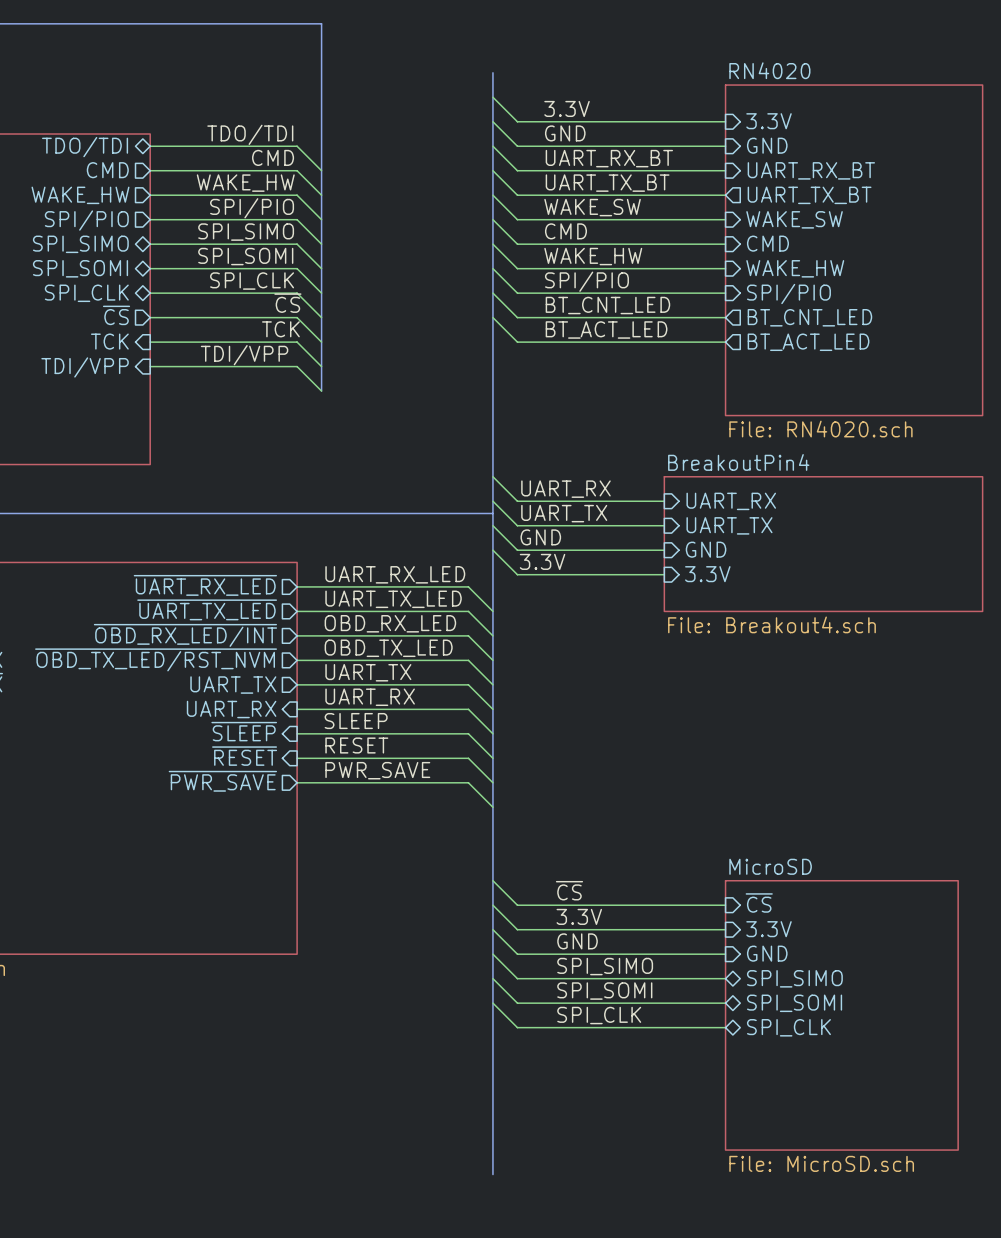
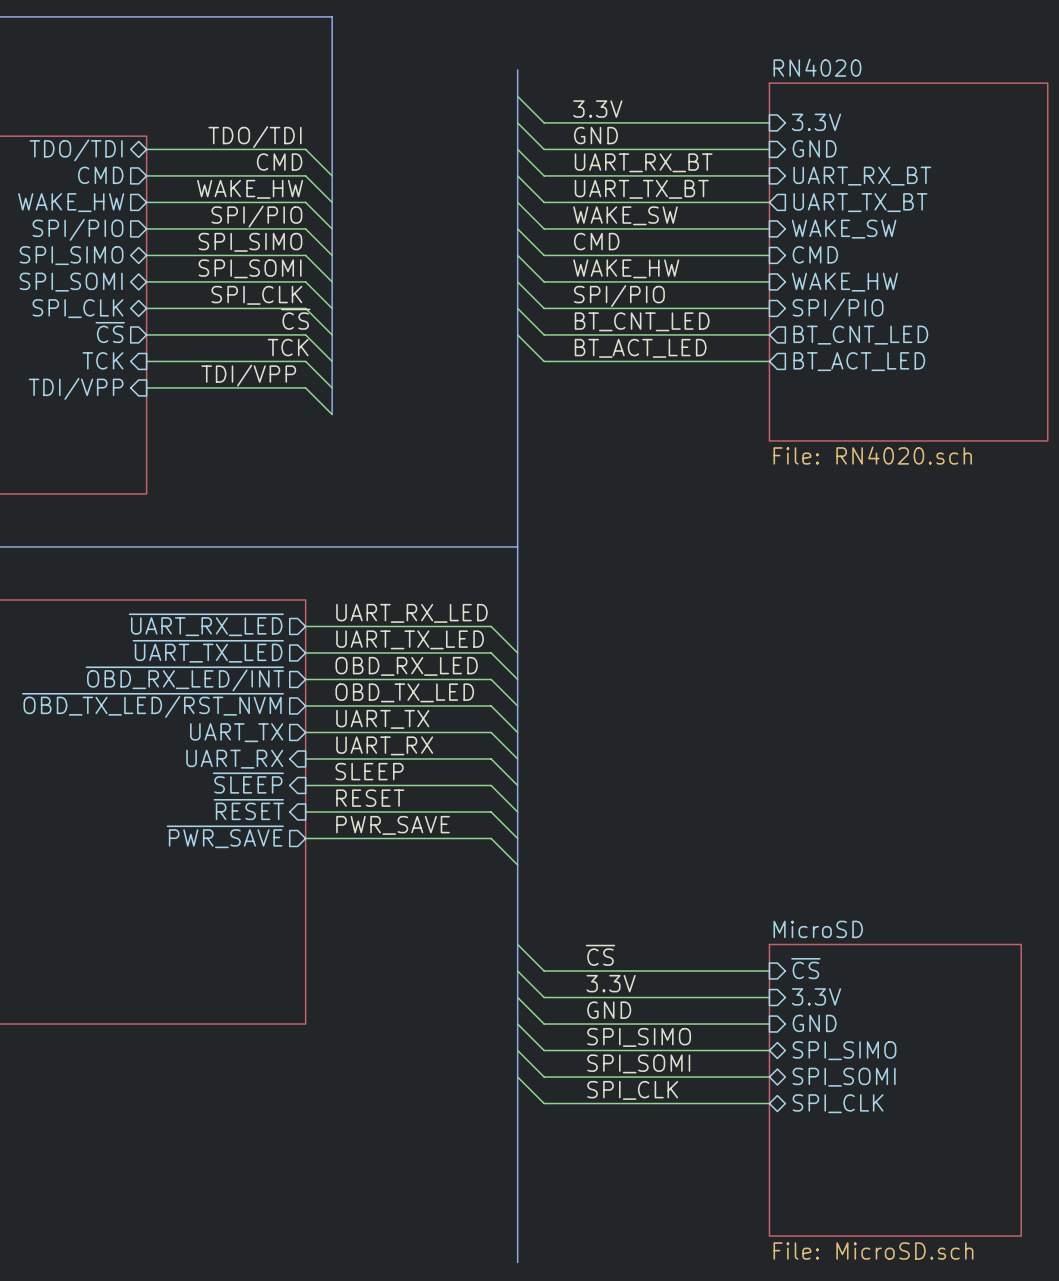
wire: (492, 476) (517, 501) (664, 501) -> none
label: UART_RX (565, 489) -> none
wire: (492, 501) (517, 525) (664, 525) -> none
sheet pin: UART_RX (731, 501) -> none
label: UART_TX (564, 513) -> none
wire: (492, 525) (517, 550) (664, 550) -> none
sheet pin: UART_TX (729, 525) -> none
label: GND (540, 537) -> none
sheet BreakoutPin4: File: Breakout4.sch (823, 544) -> none
sheet pin: GND (706, 549) -> none
wire: (492, 550) (517, 574) (664, 574) -> none
label: 3.3V (542, 561) -> none
sheet pin: 3.3V (707, 574) -> none

